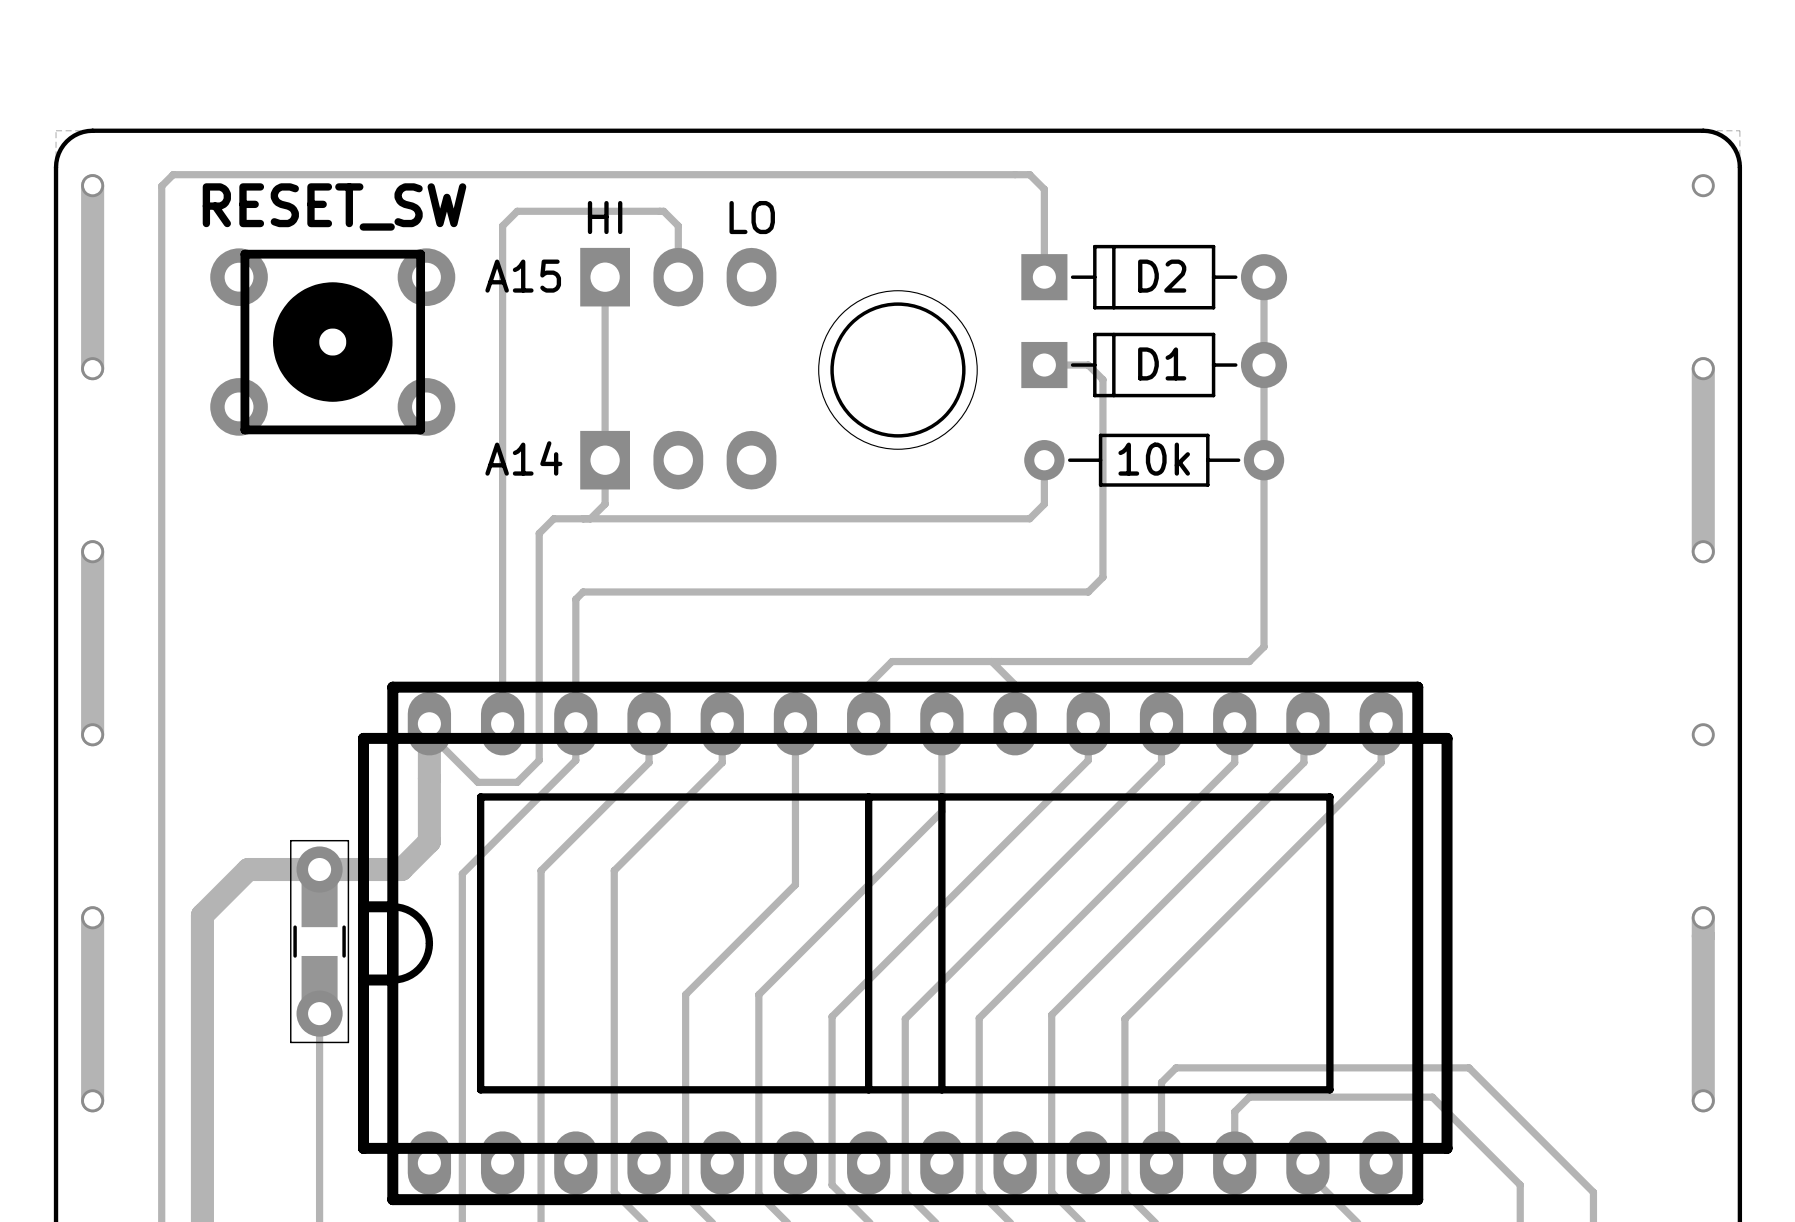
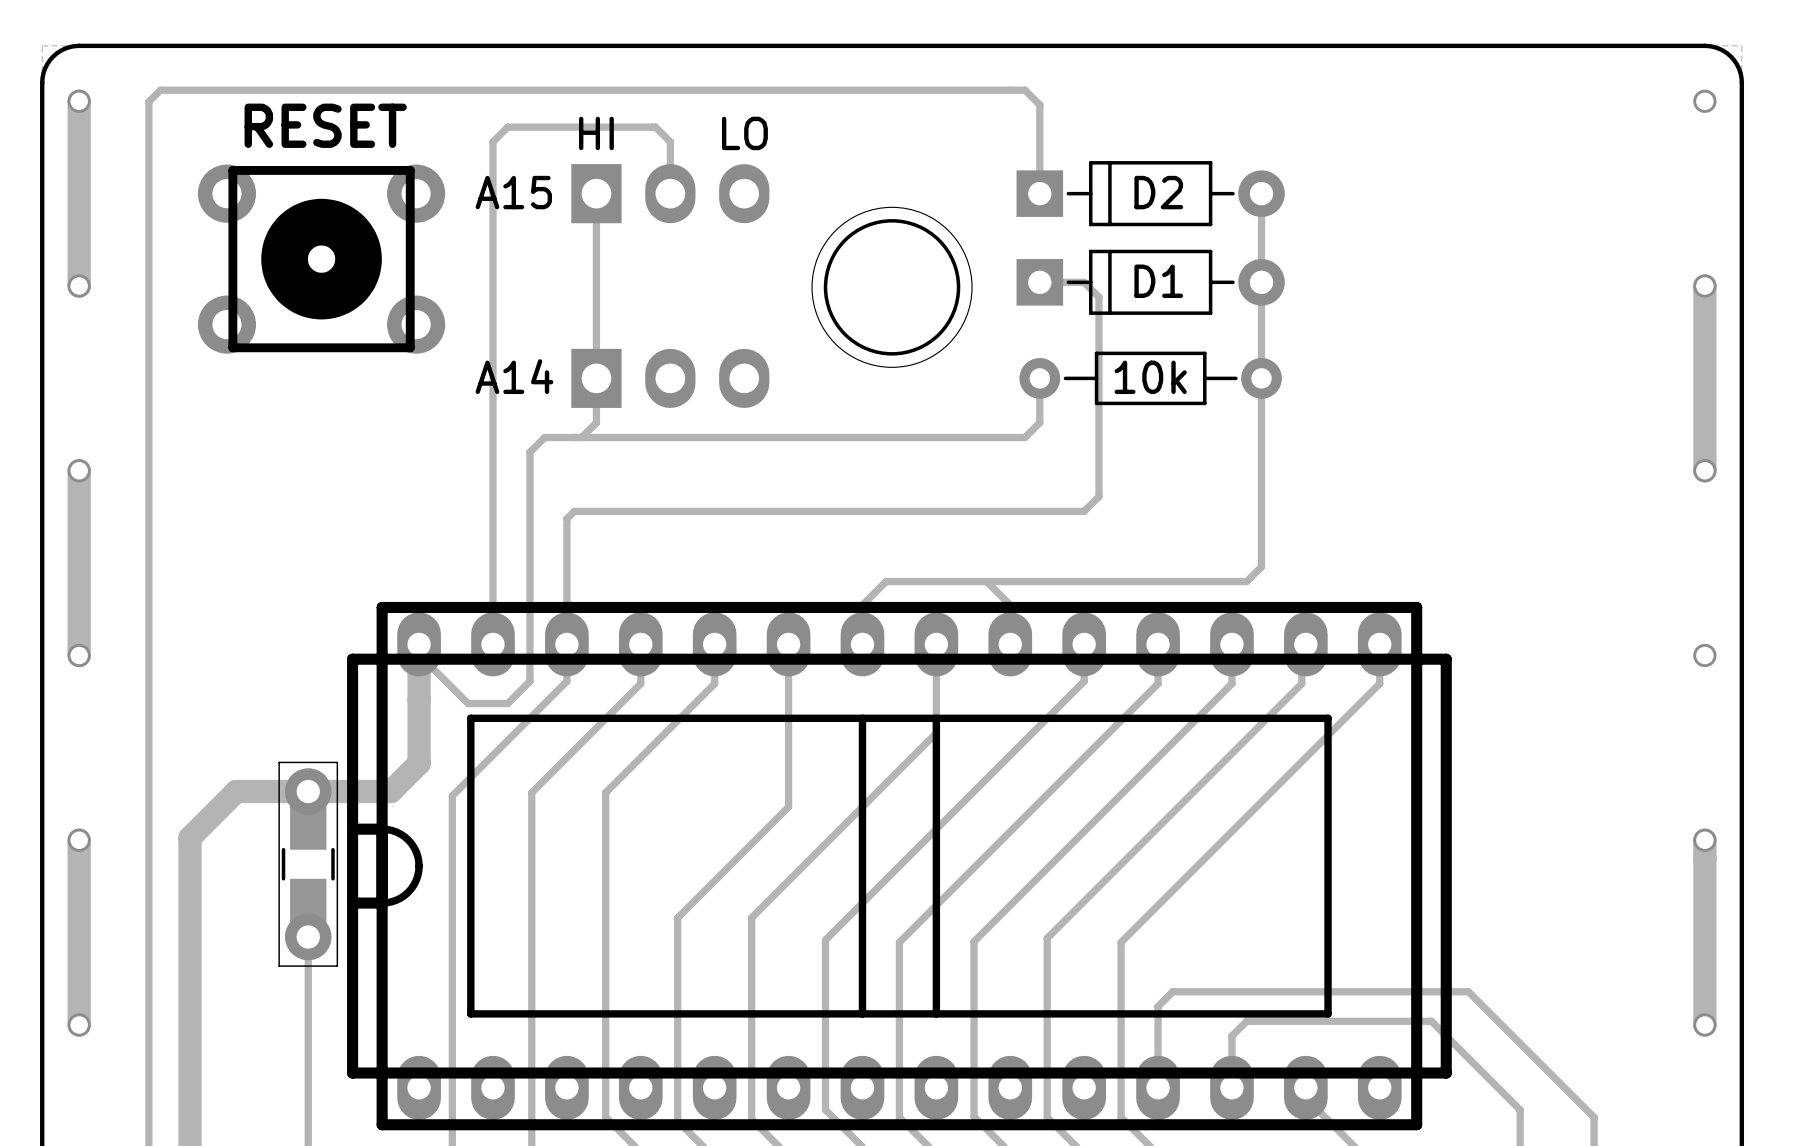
part value: RESET_SW (334, 206) -> RESET (325, 125)

